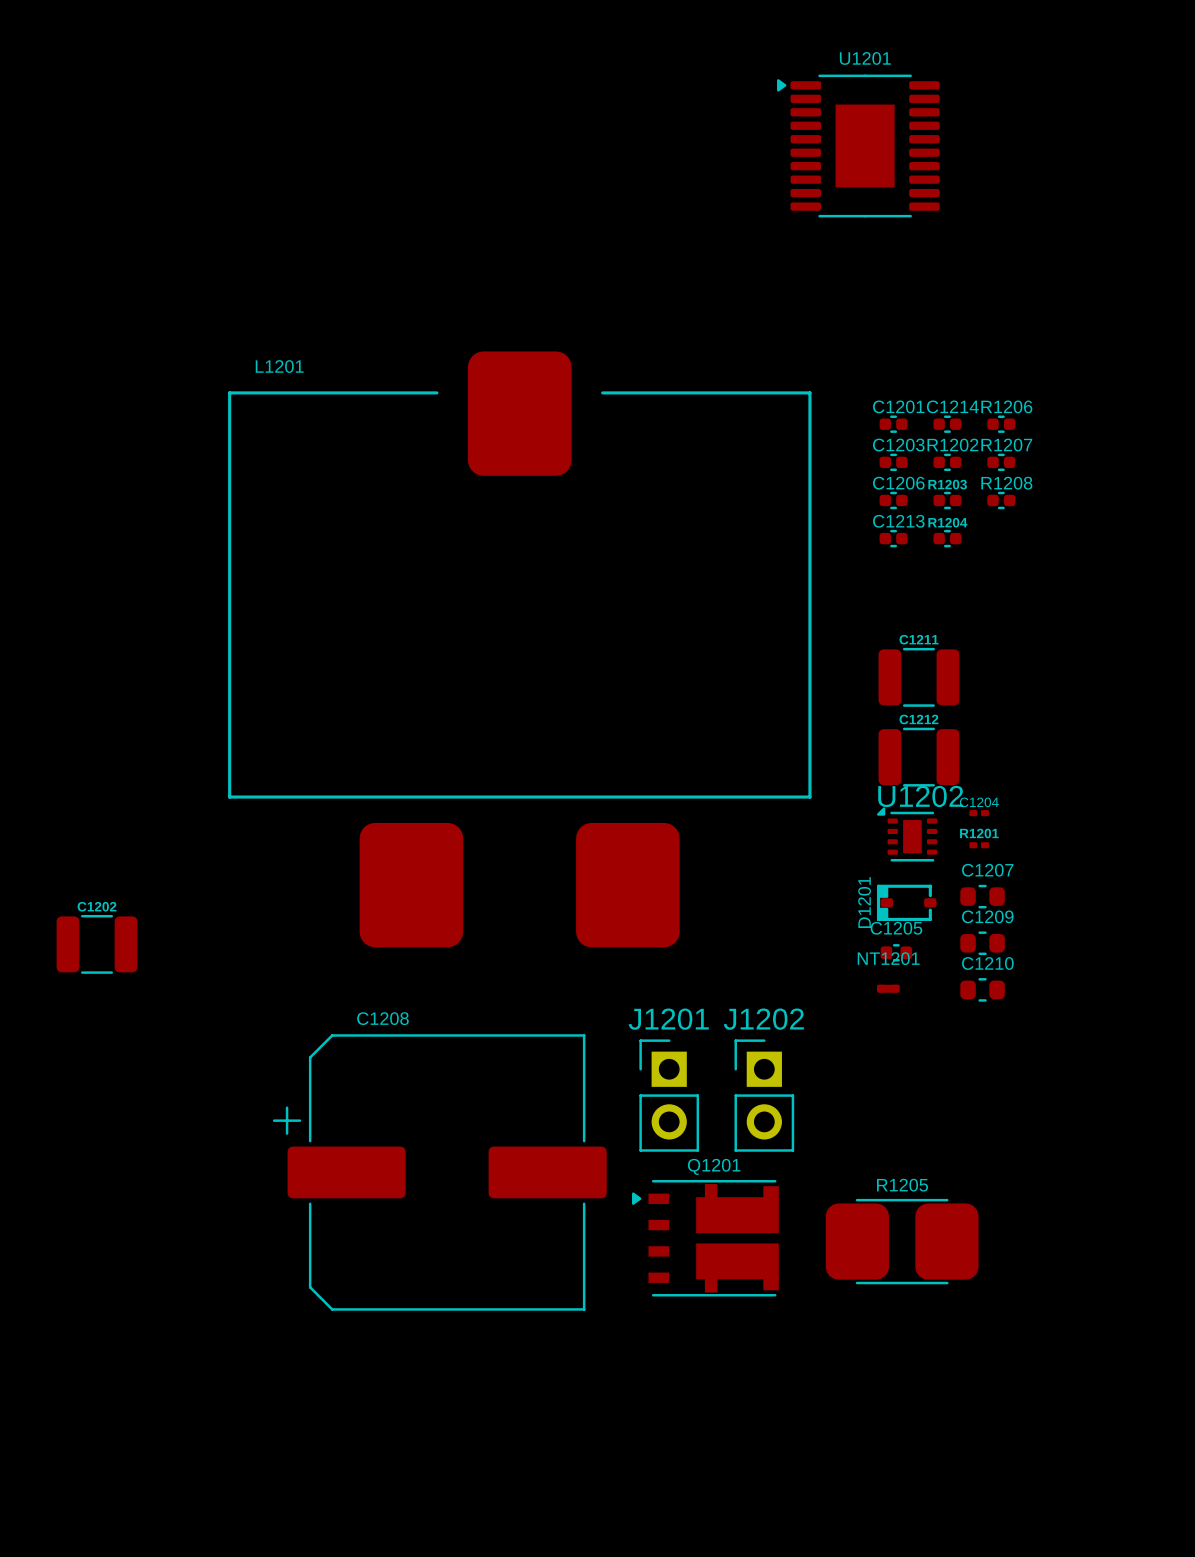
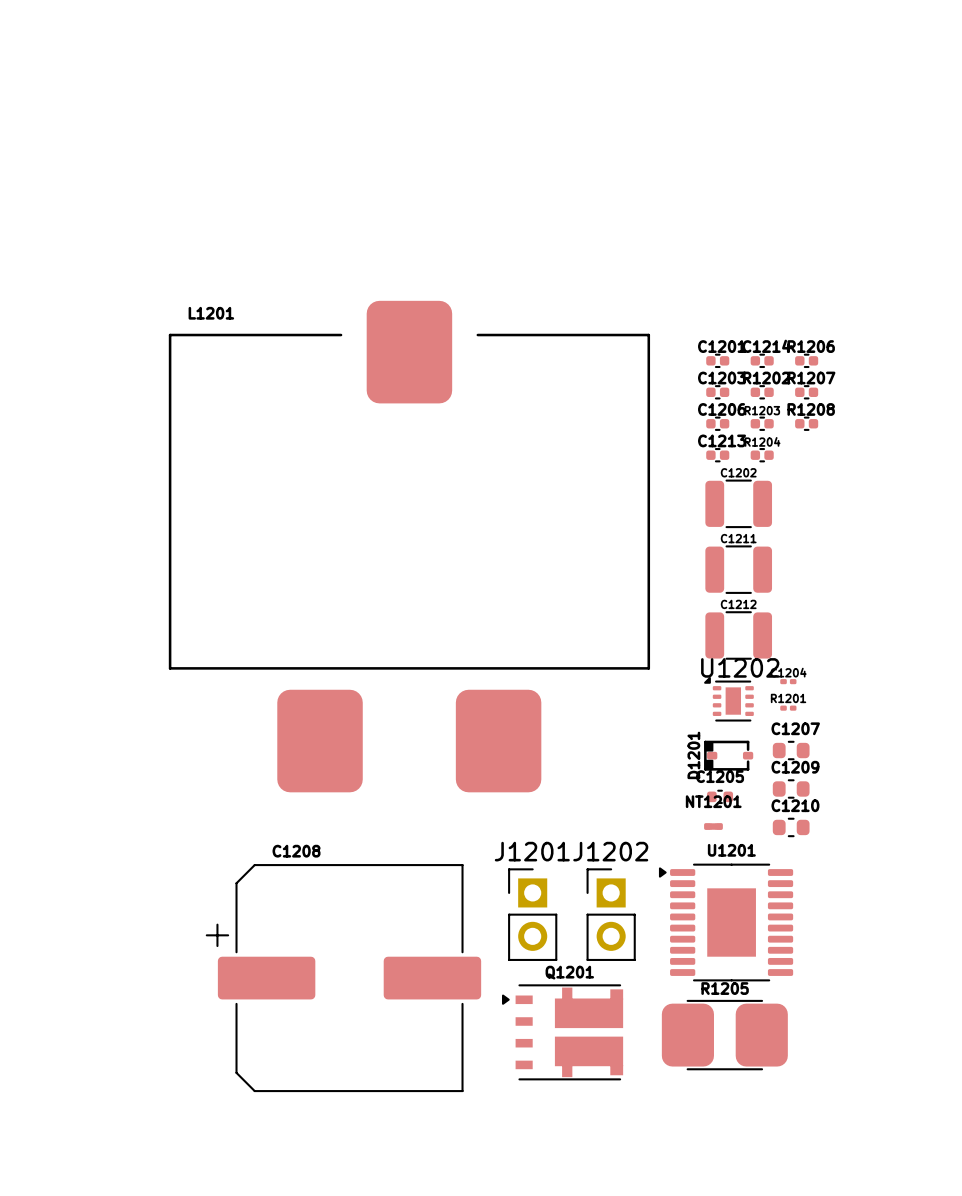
U1201 position: (858, 145) -> (726, 922)
C1202 position: (97, 944) -> (738, 503)

